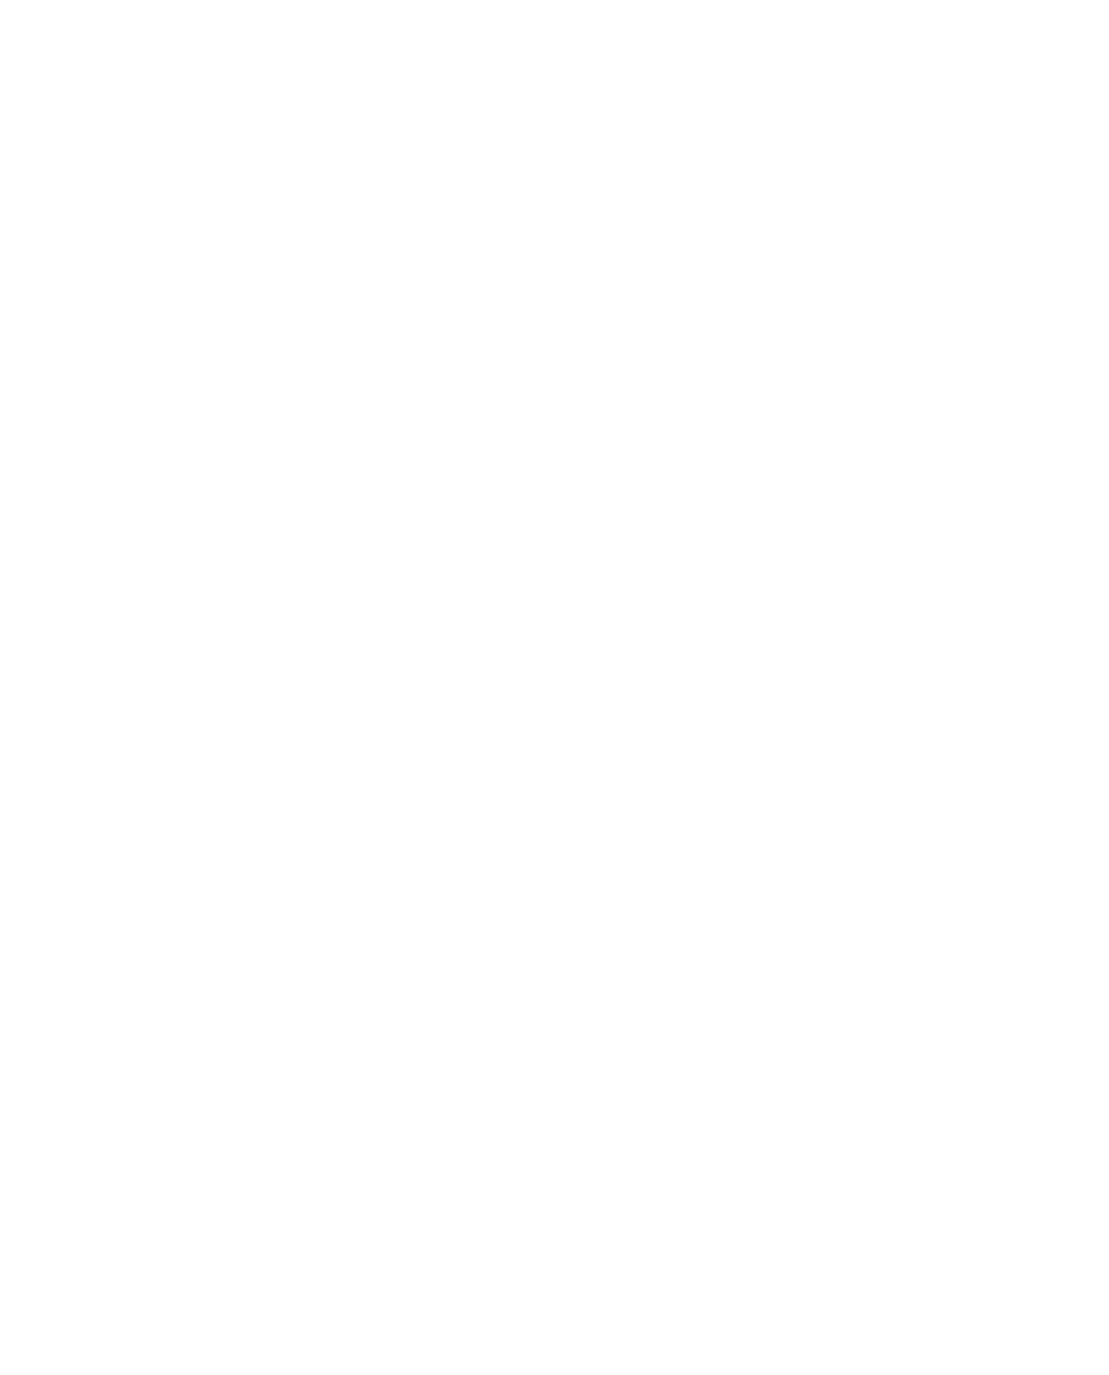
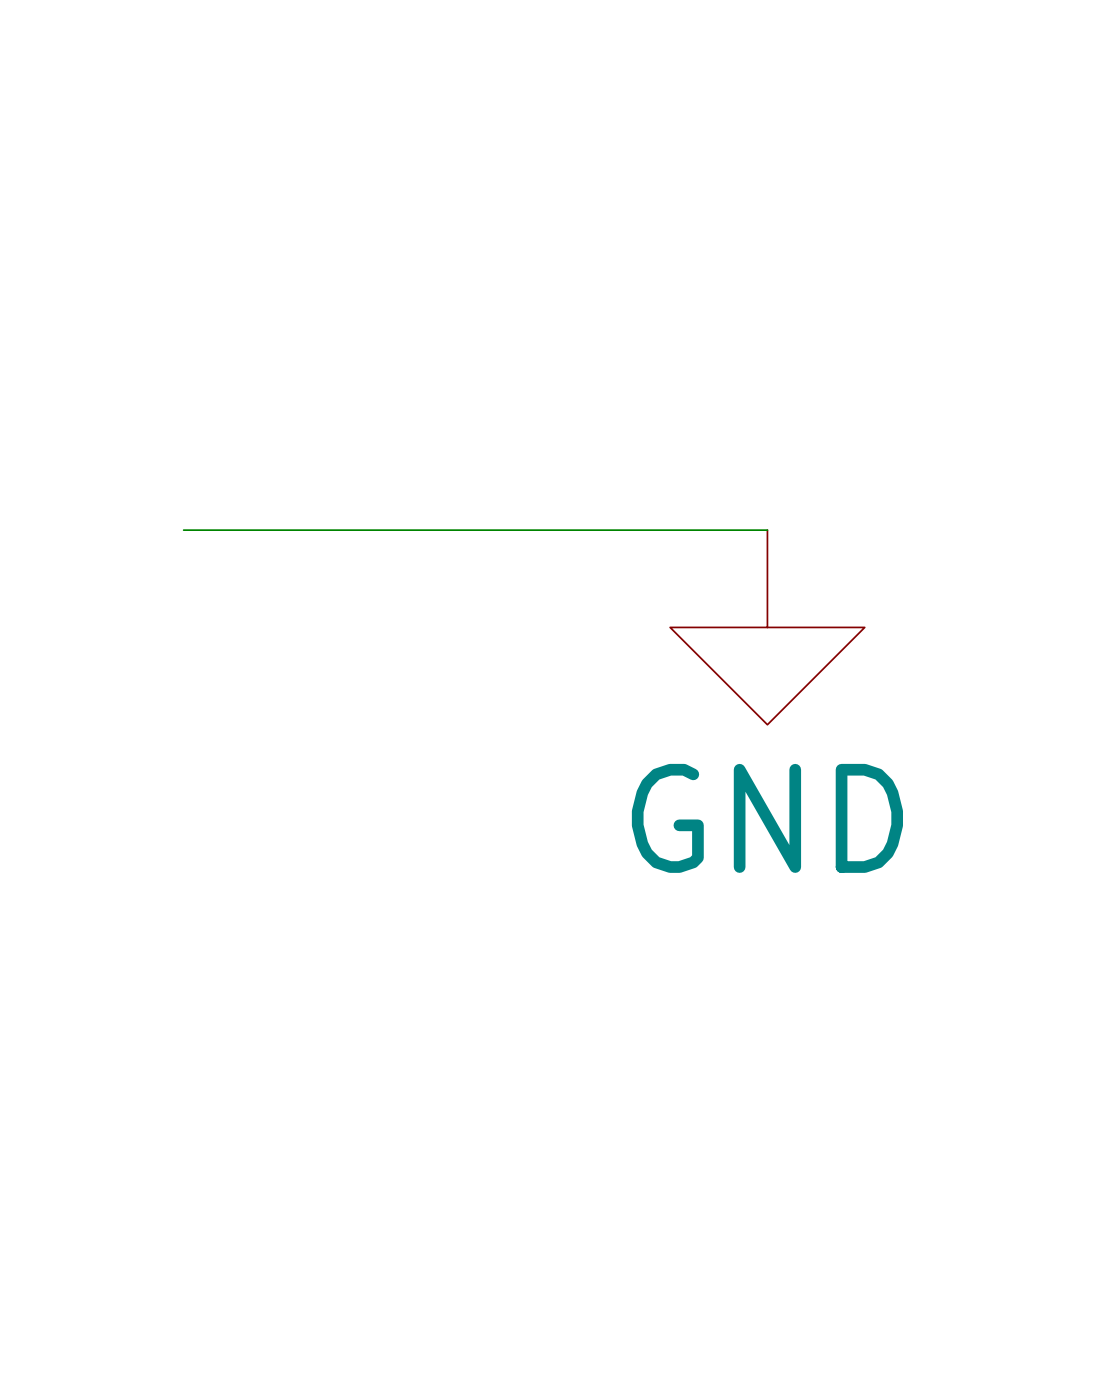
wire: none -> (183, 530) (767, 530)
power symbol: none -> GND (767, 627)

